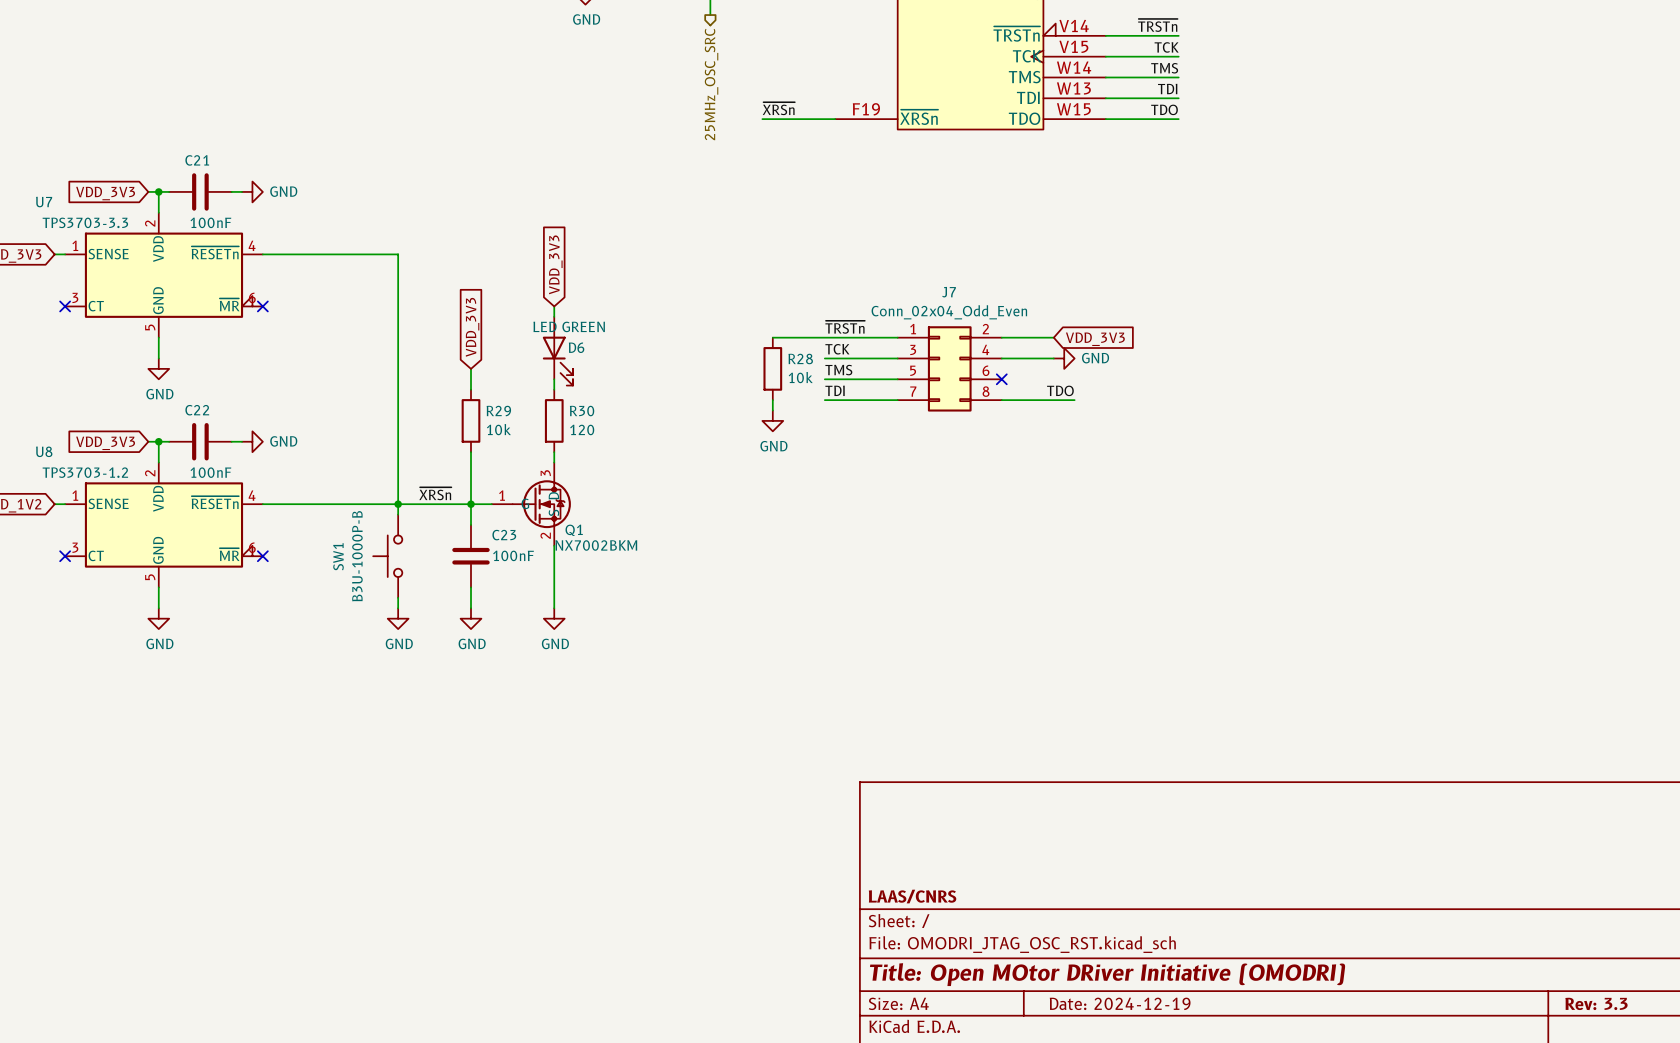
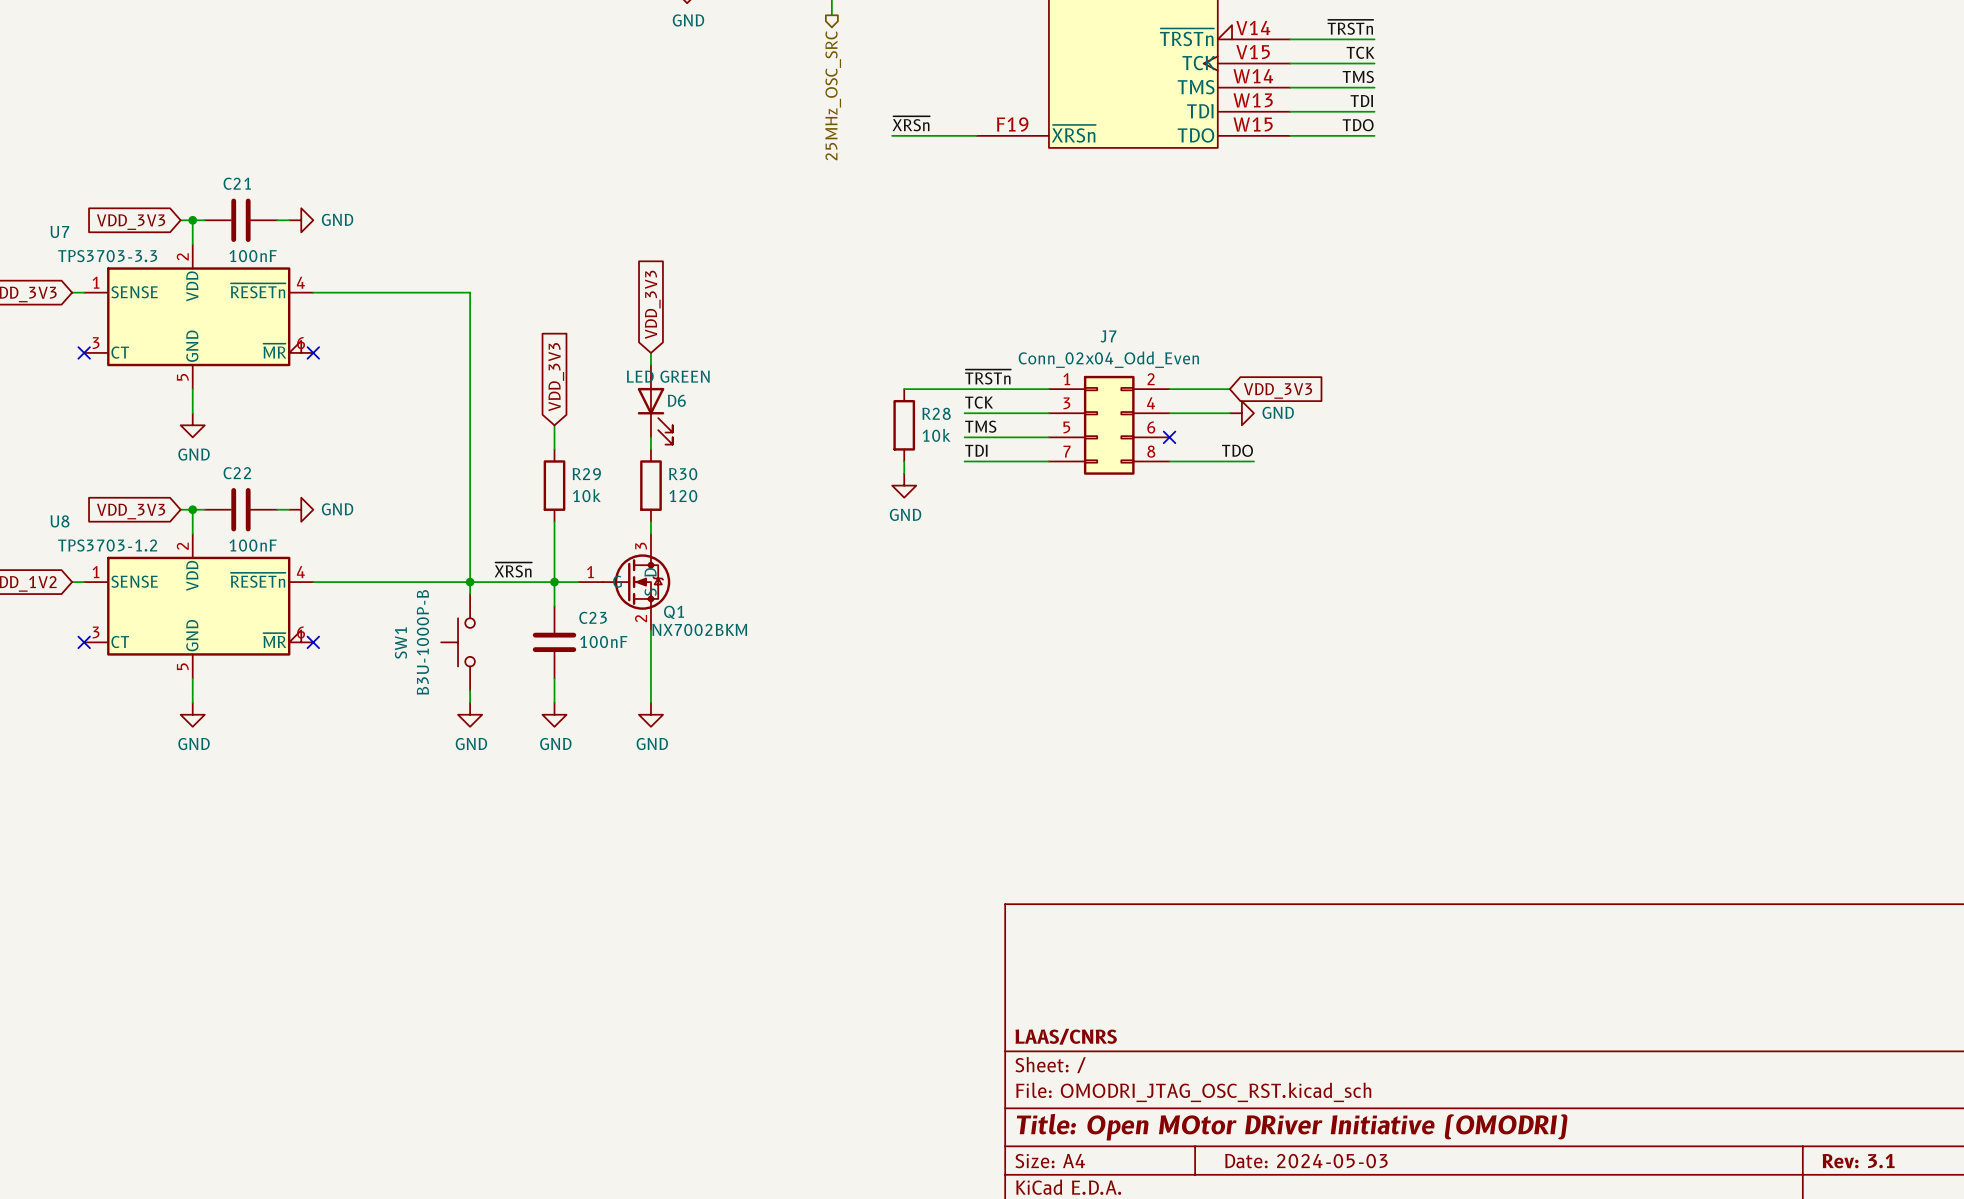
title block: Date: 2024-12-19 (1120, 1003) -> Date: 2024-05-03 (1306, 1161)
title block: Rev: 3.3 (1596, 1003) -> Rev: 3.1 (1858, 1161)

